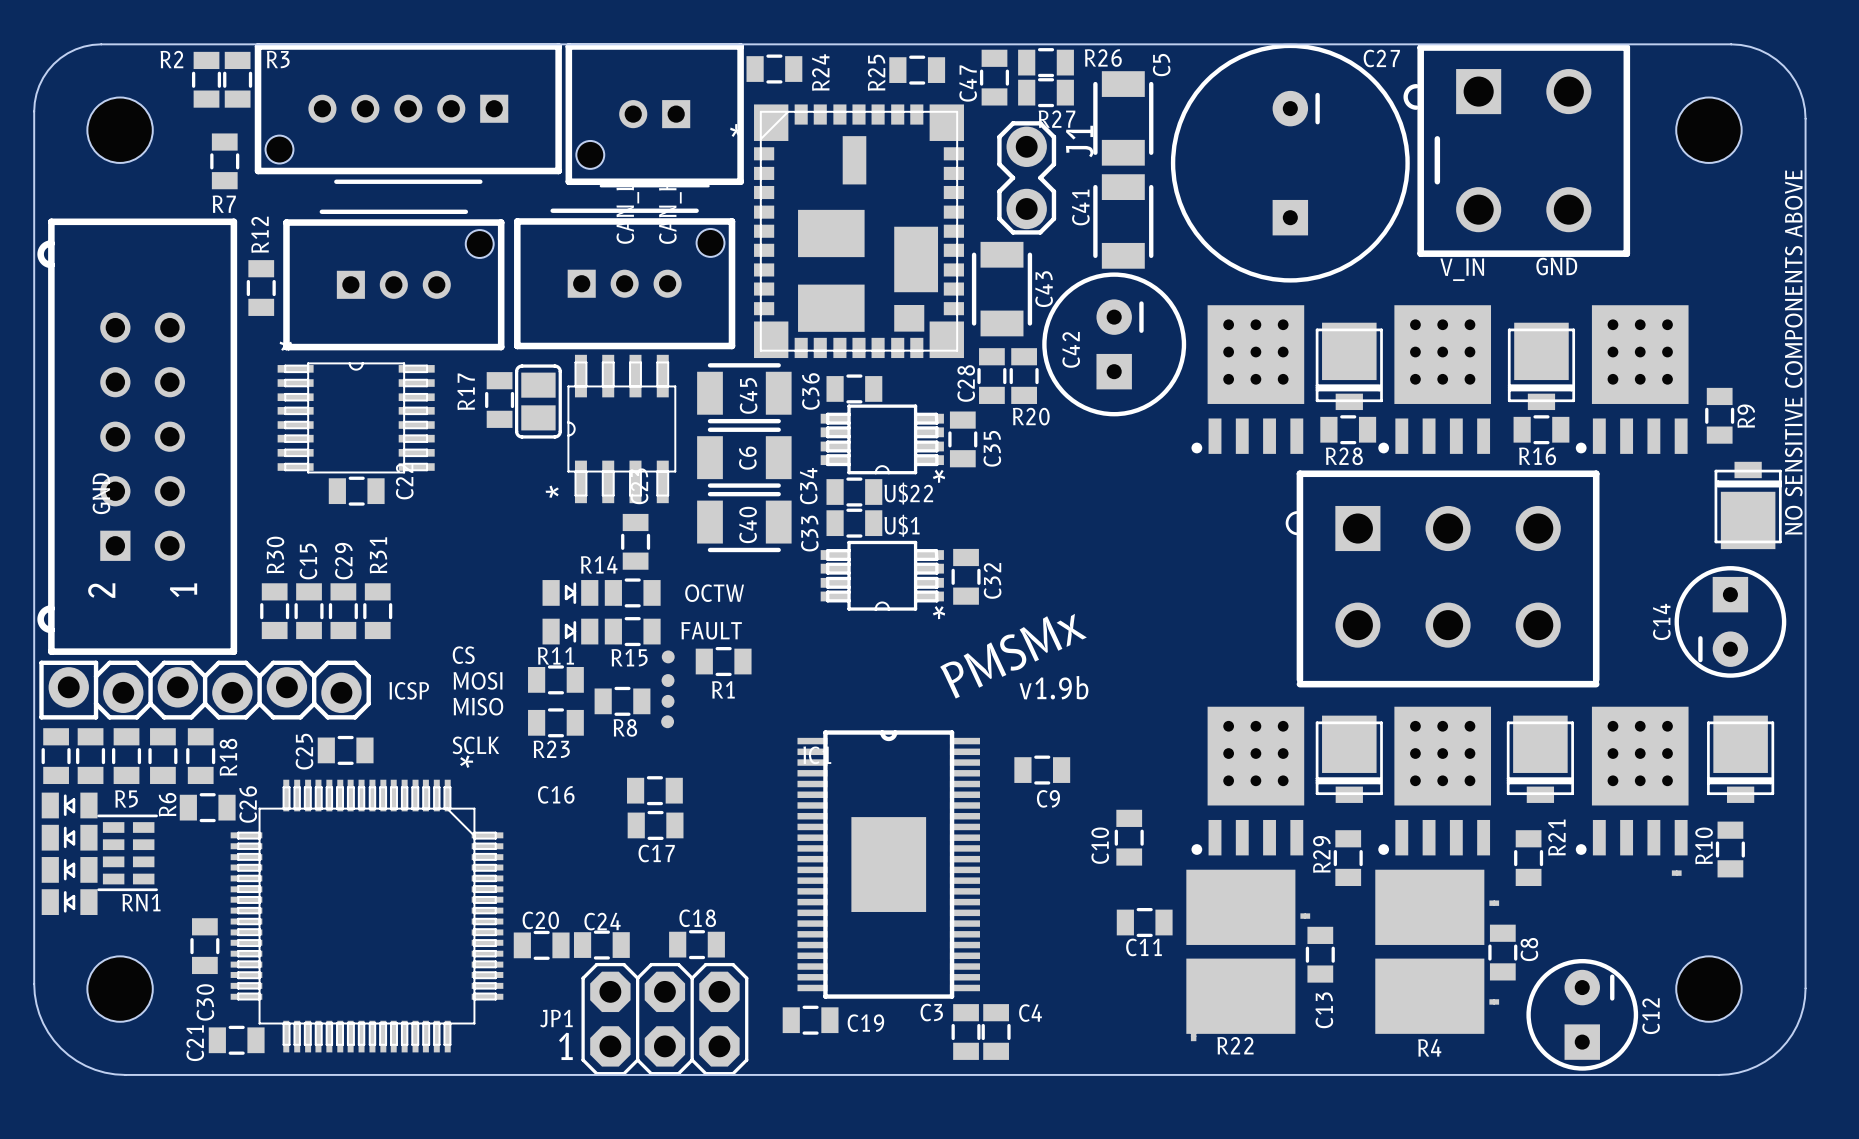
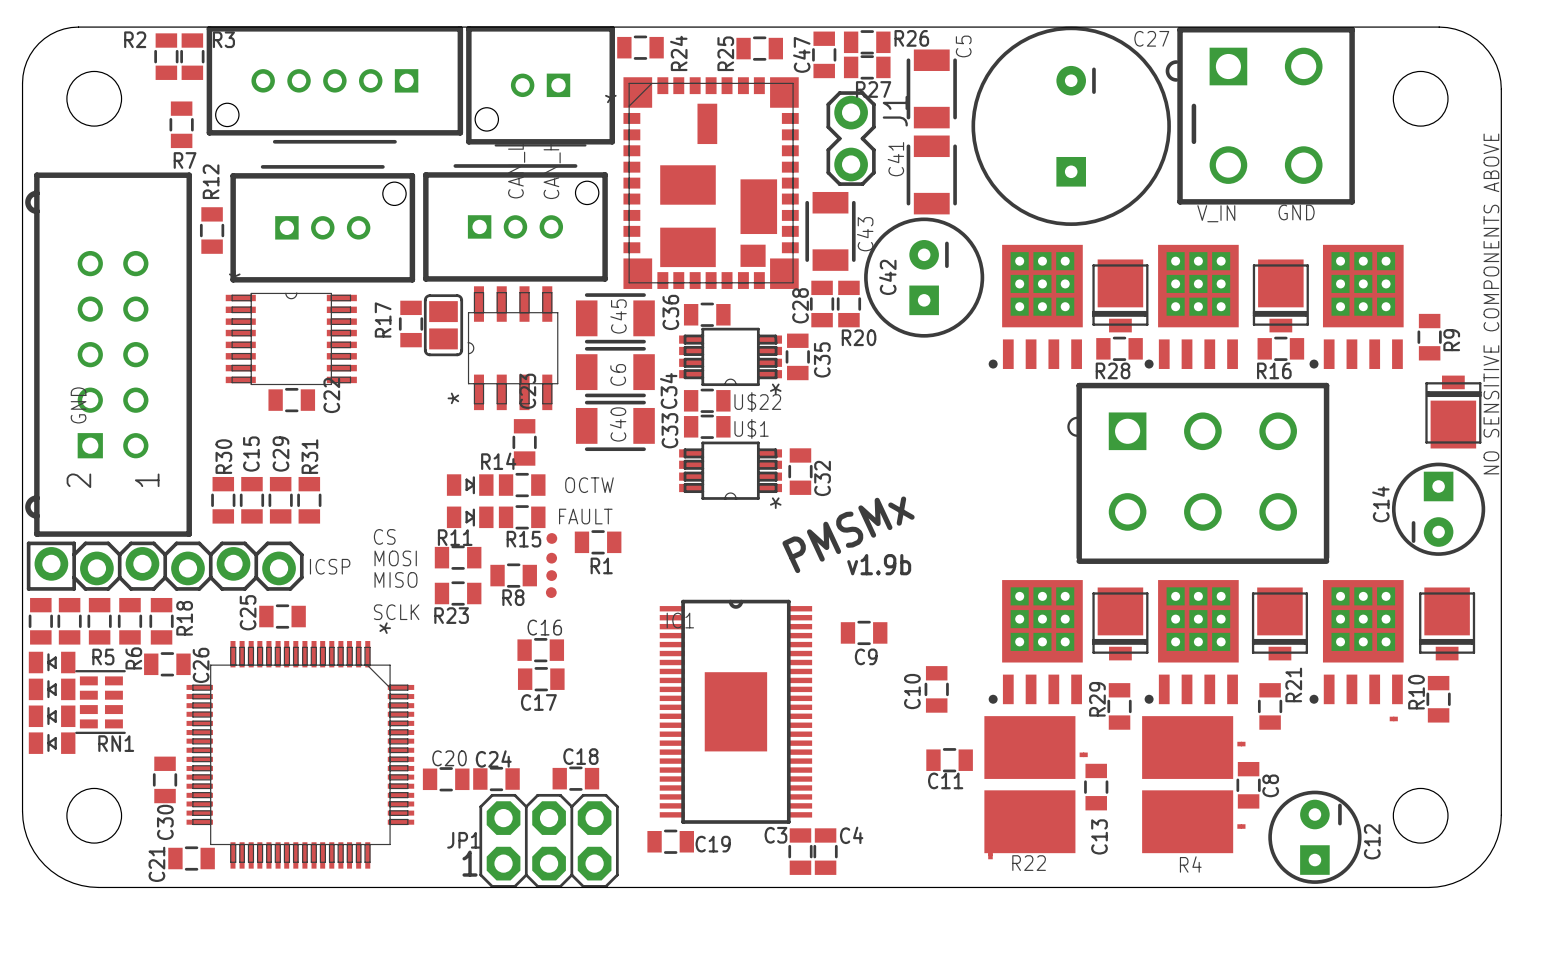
C16 name position: C16 (556, 794) -> C16 (544, 627)

